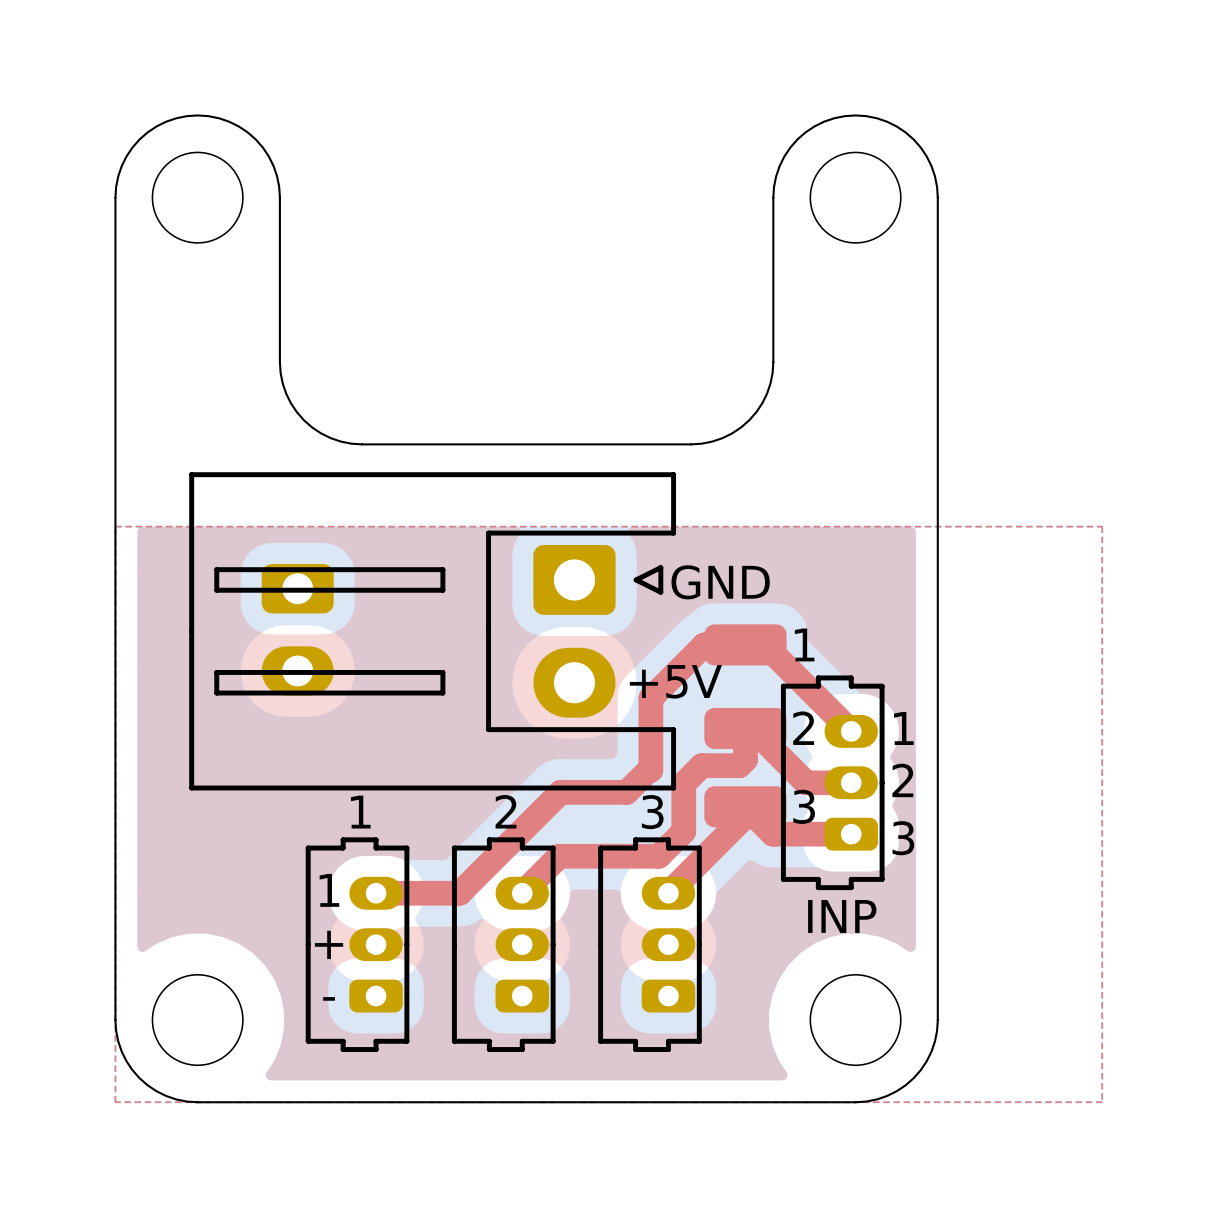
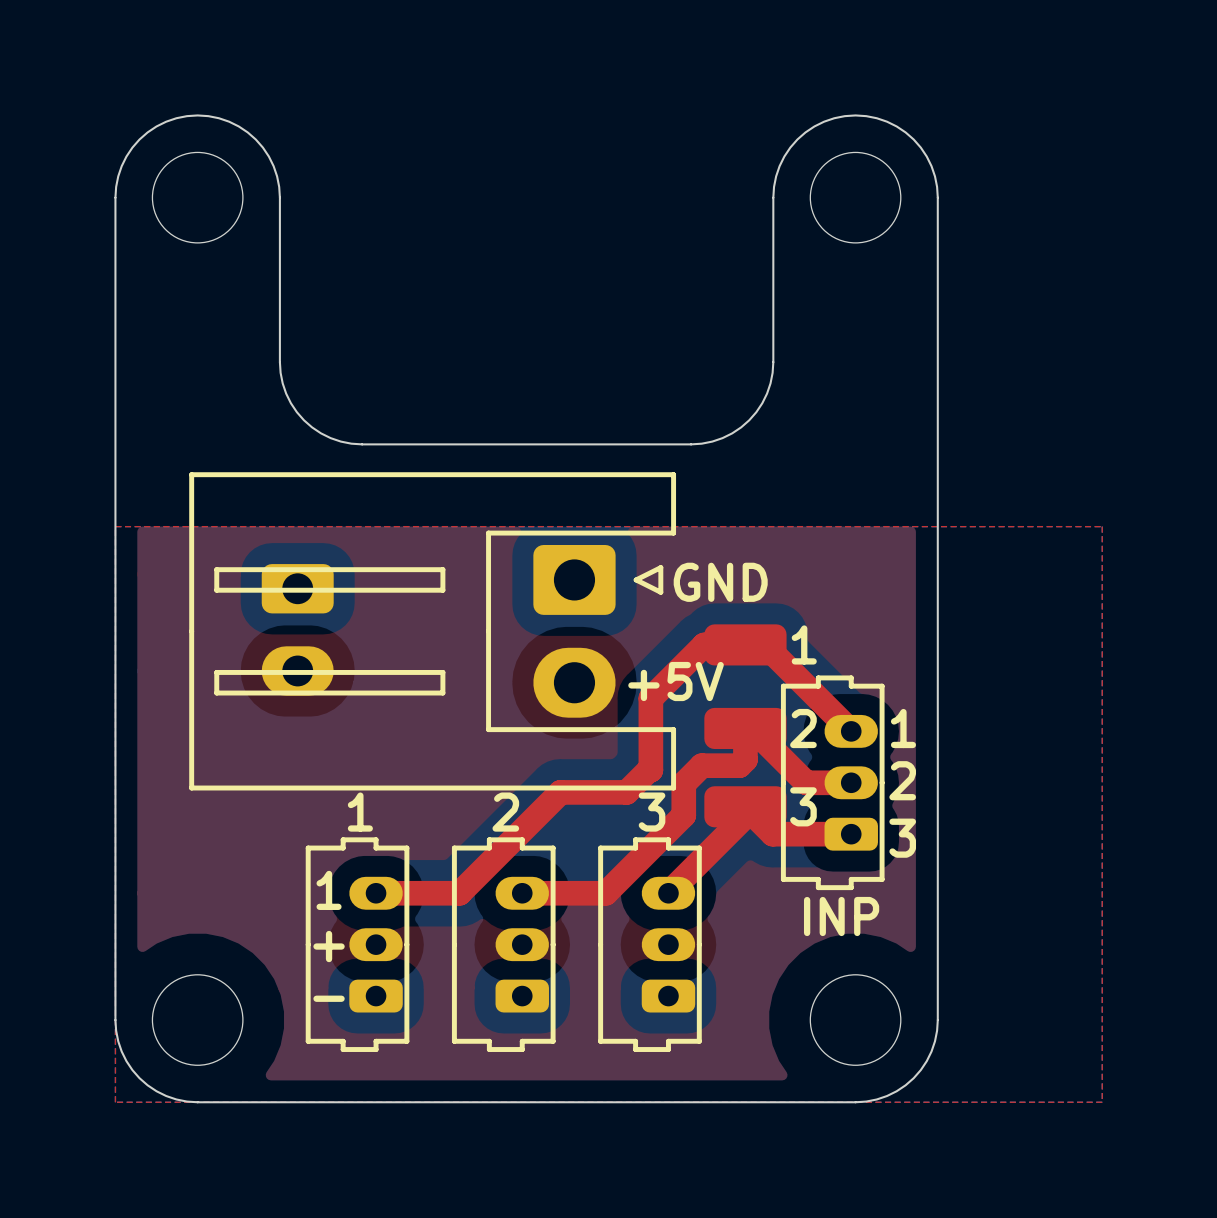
top track: (683, 815) (683, 831) (658, 856) (559, 856) (522, 893) -> (683, 815) (605, 893) (522, 893)

